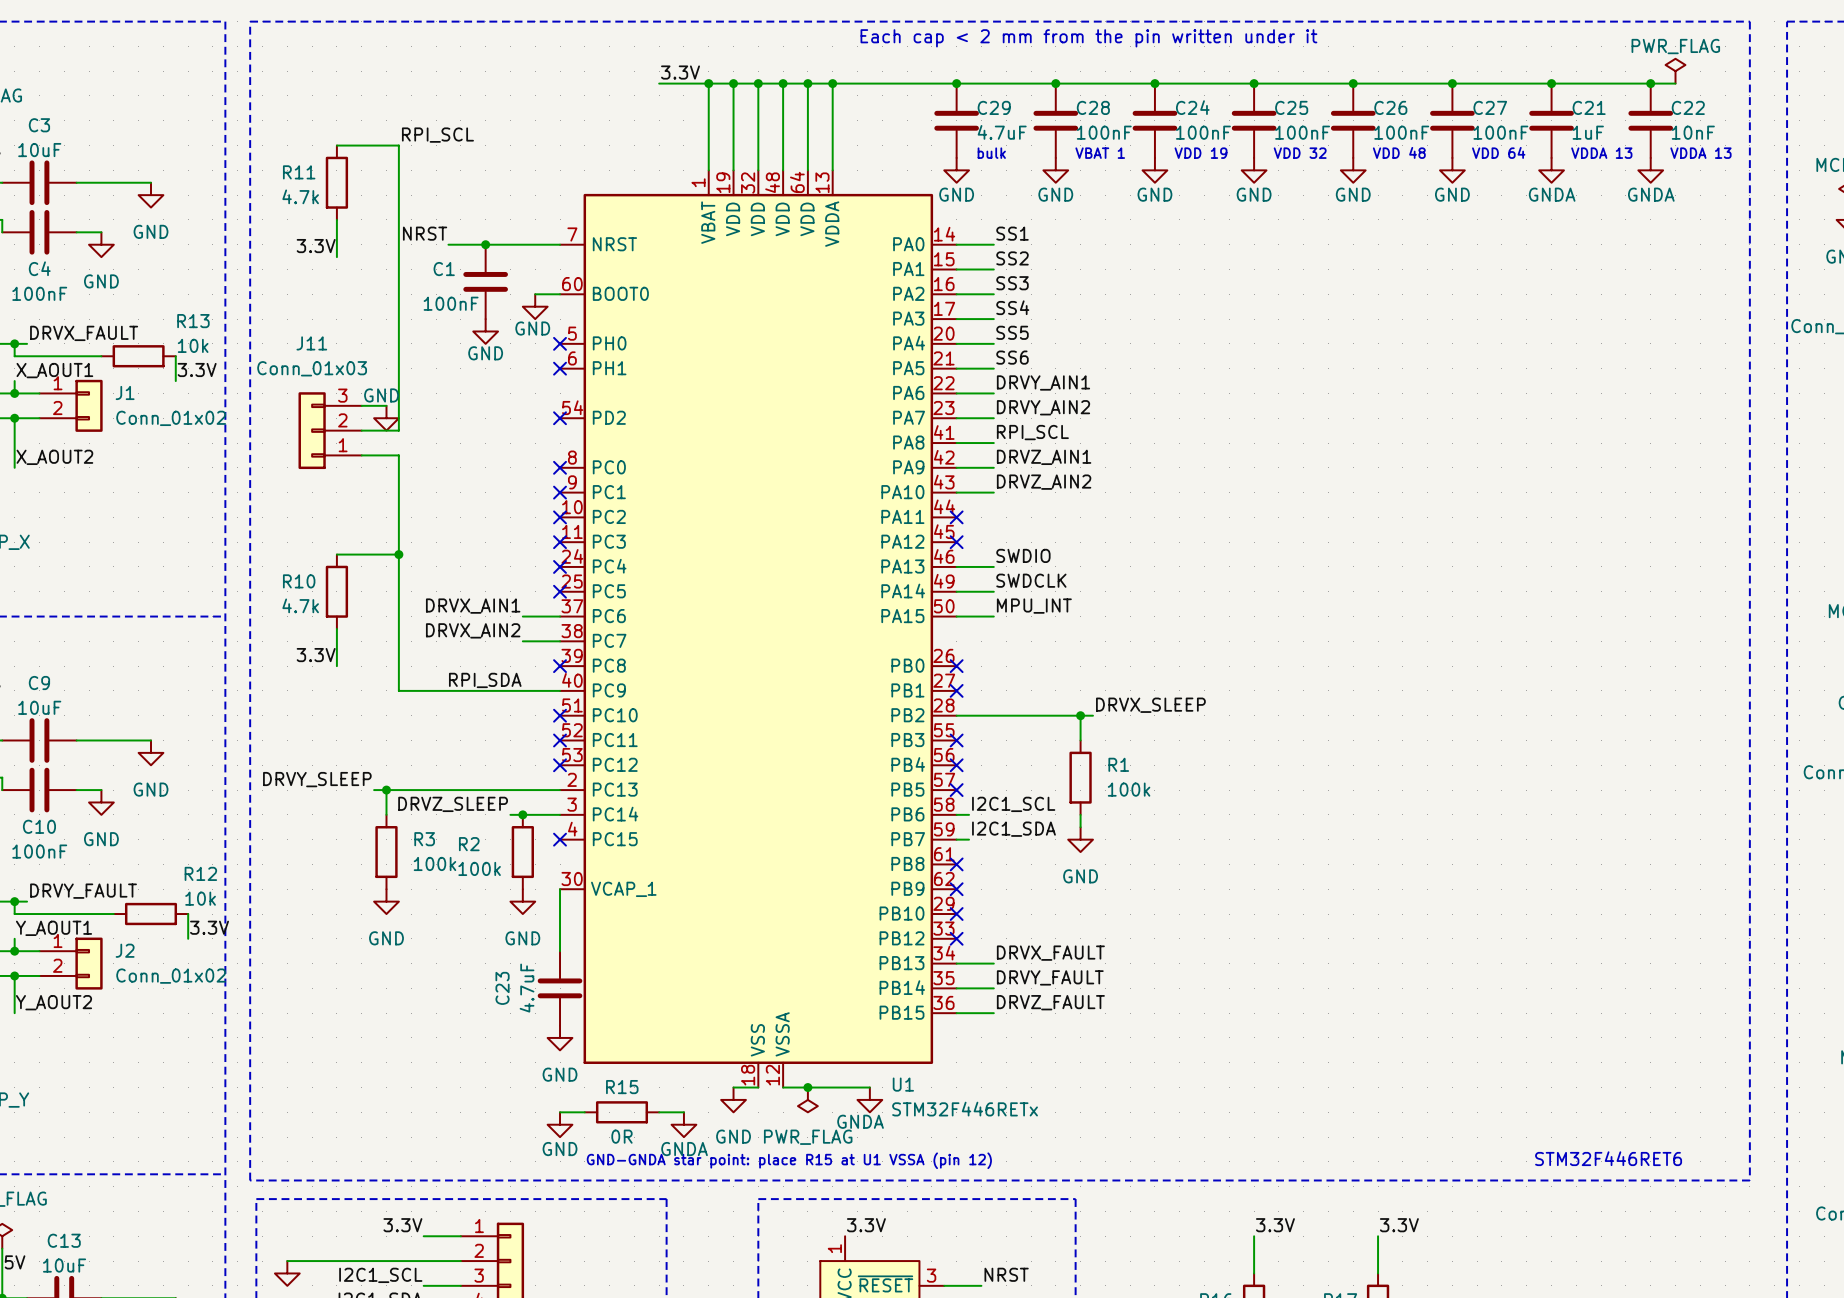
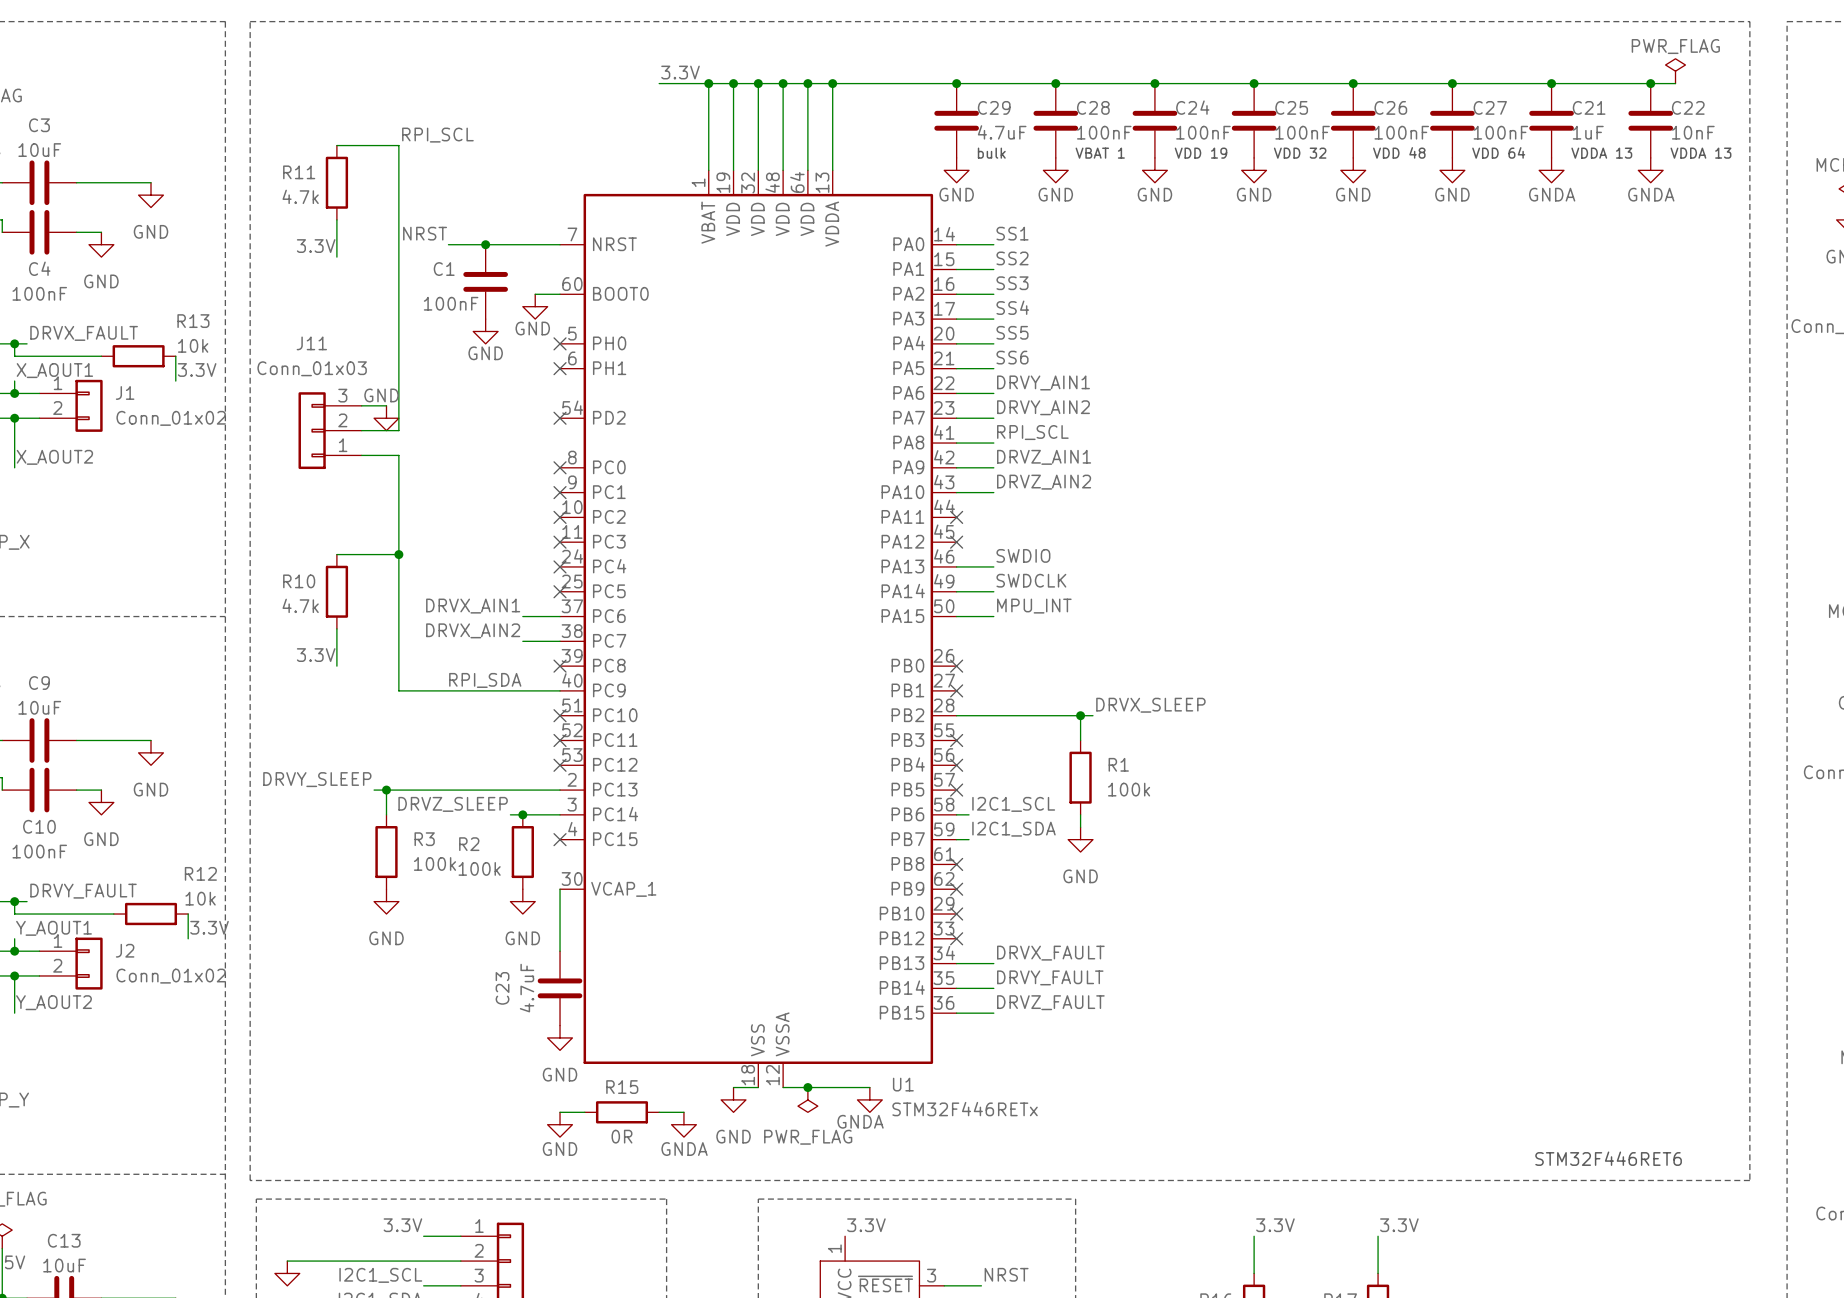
text: Each cap < 2 mm from the pin written under it (1088, 38) -> none
text: GND-GNDA star point: place R15 at U1 VSSA (pin 12) (789, 1160) -> none

